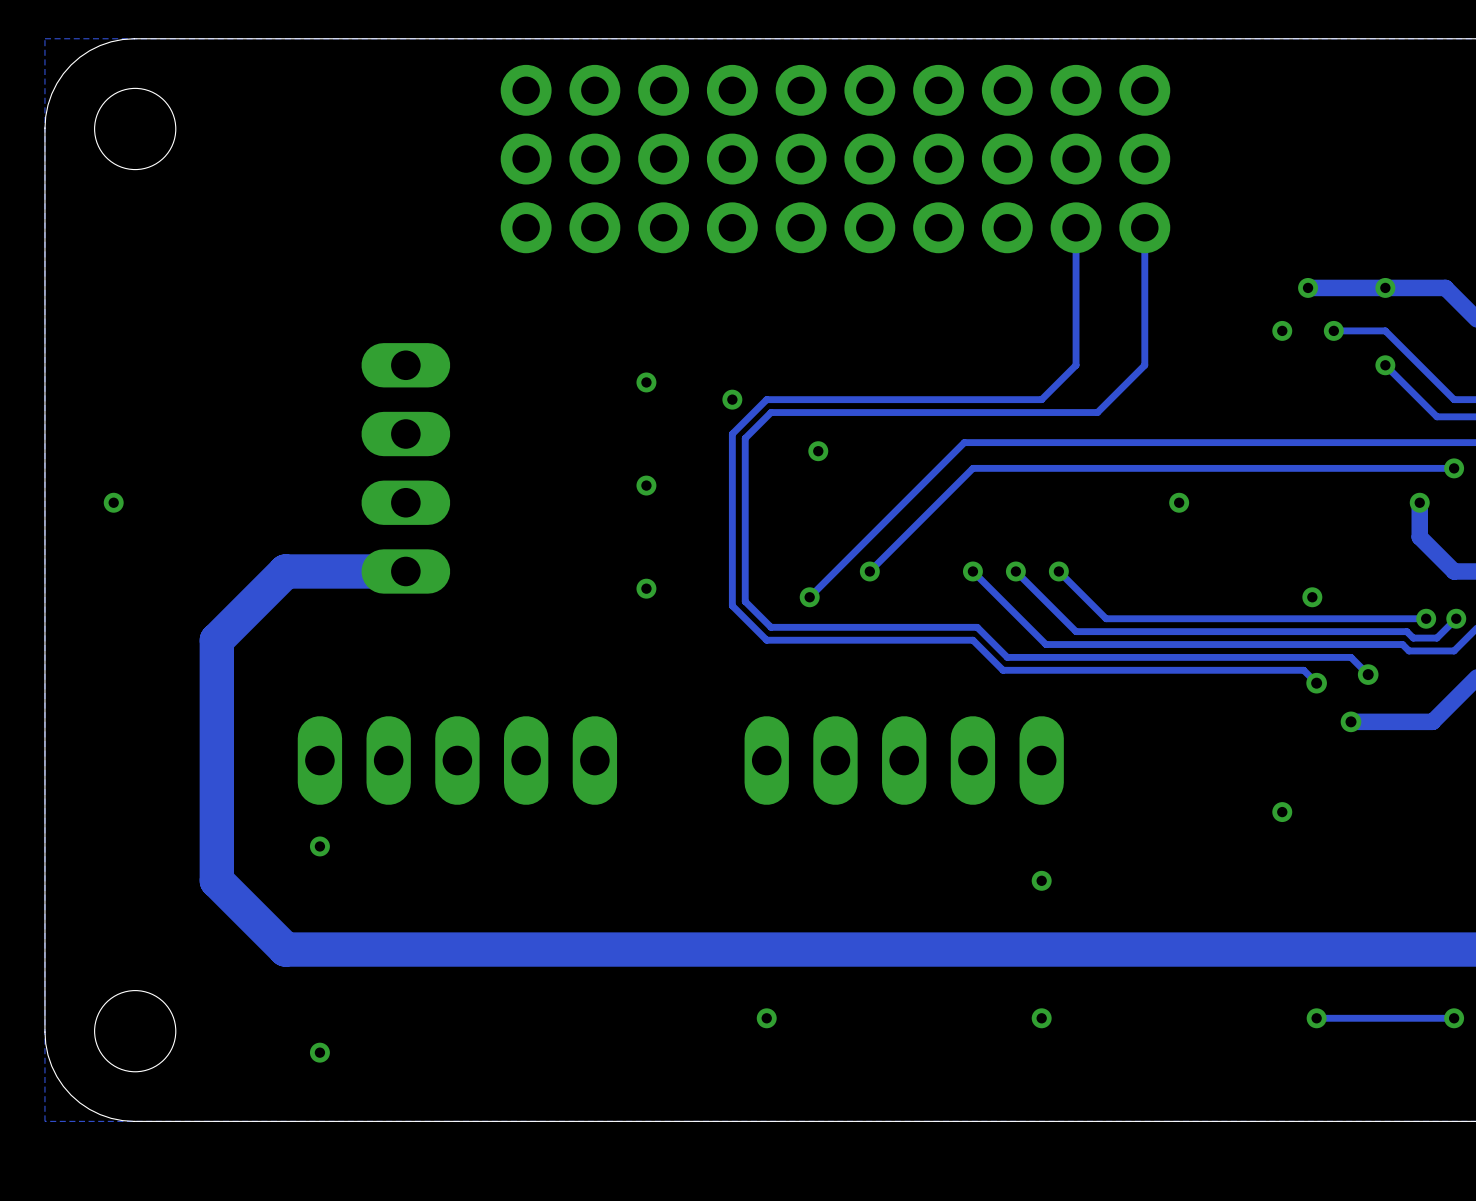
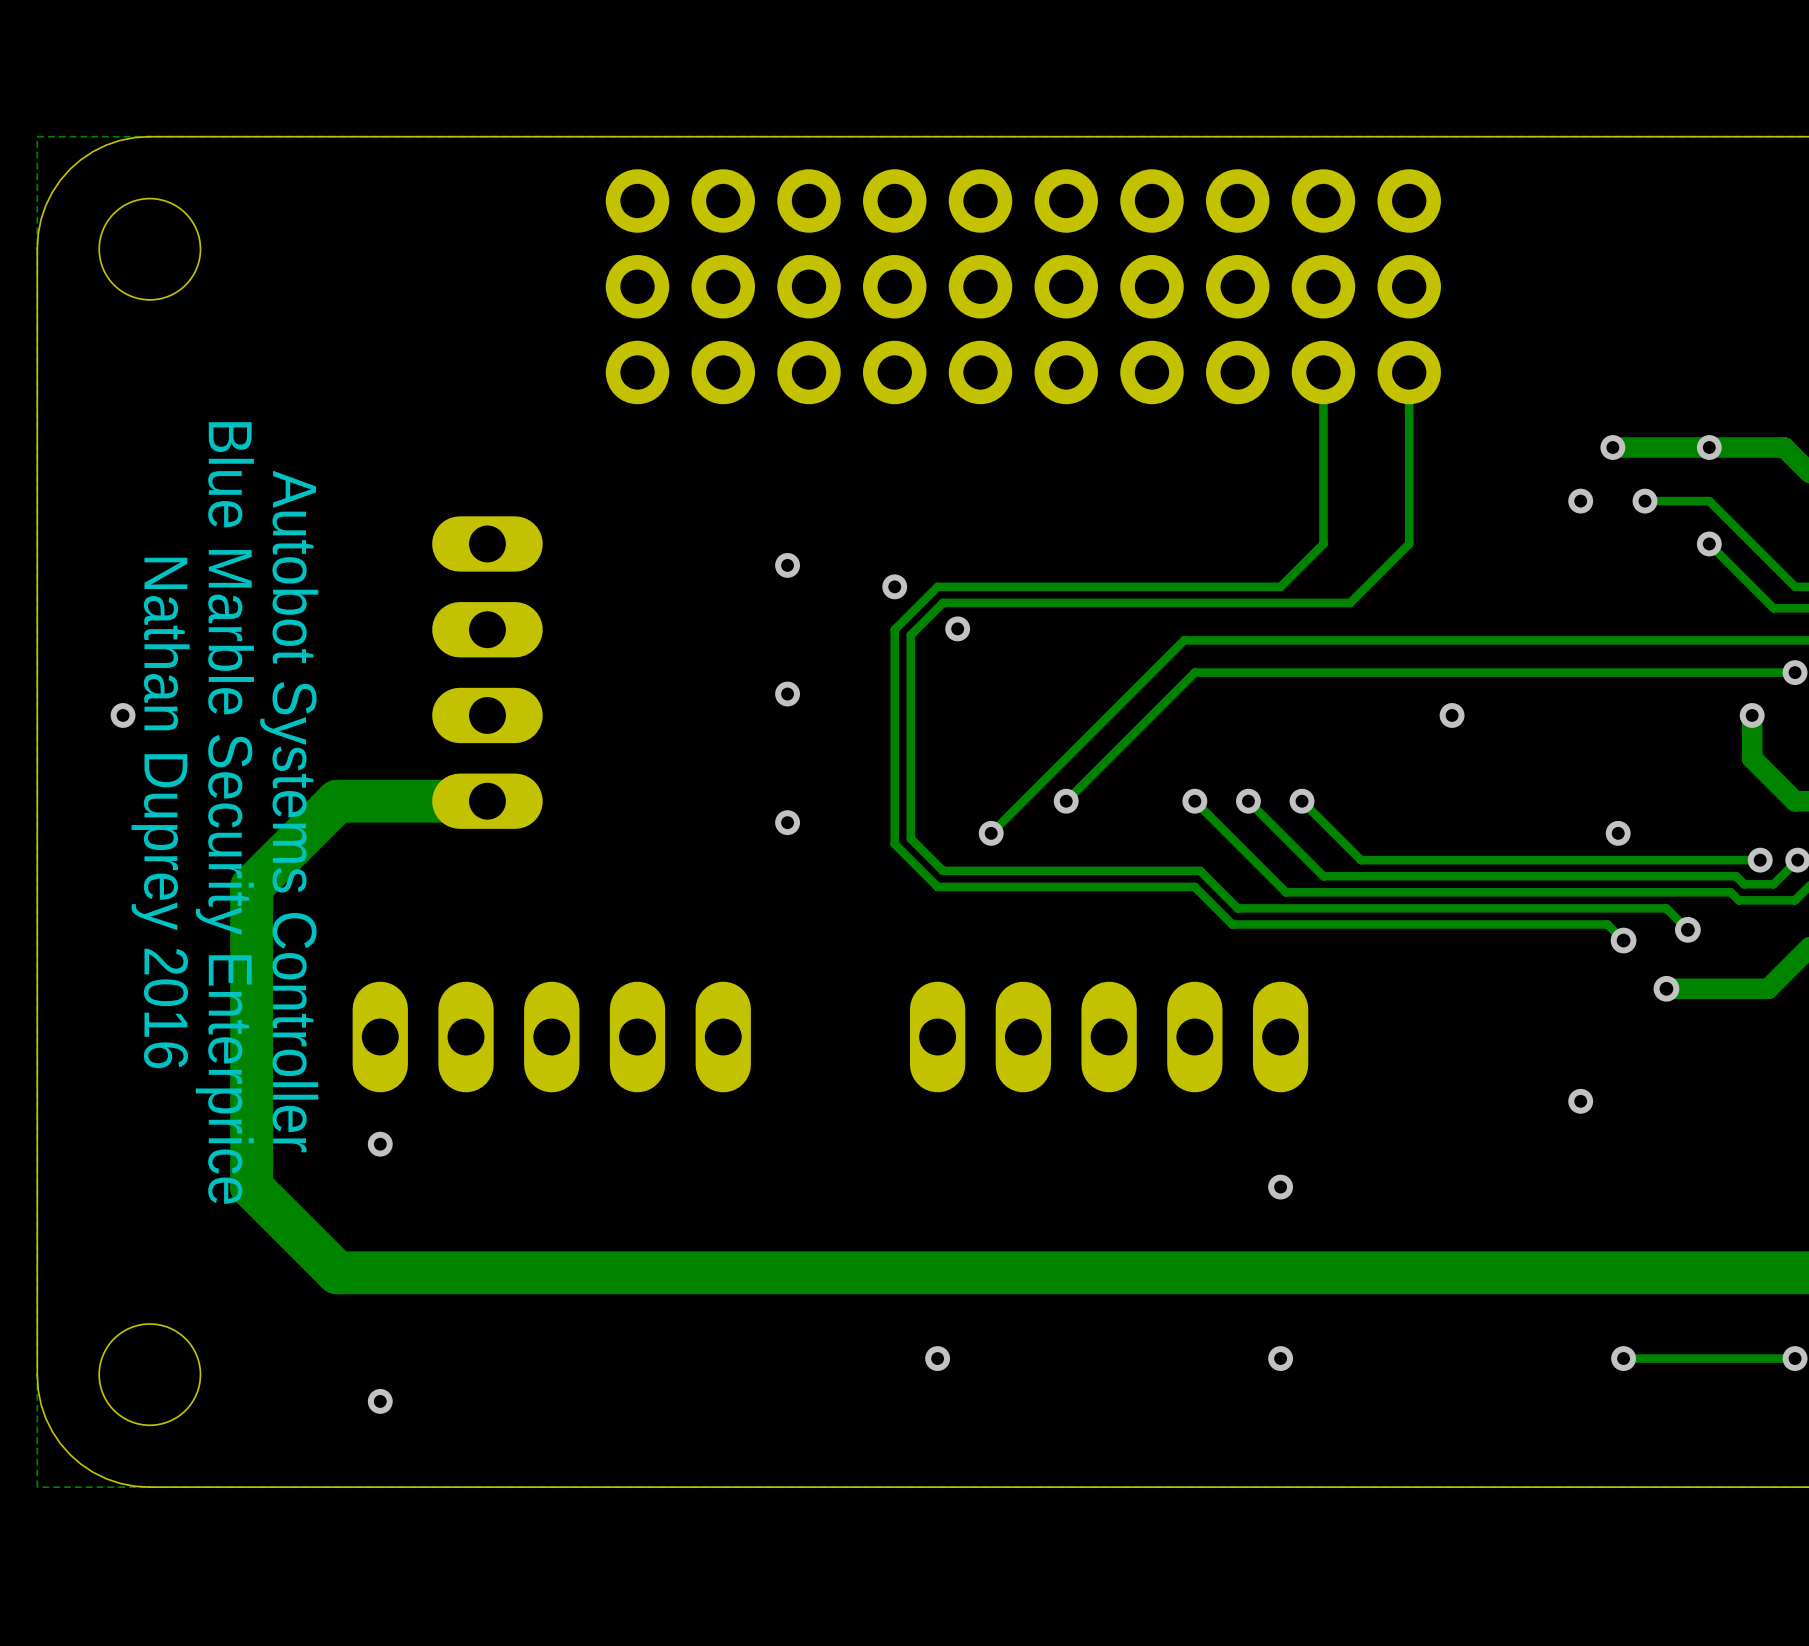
via position: (818, 451) -> (957, 628)
text: none -> Nathan Duprey 2016 (160, 812)
text: none -> Blue Marble Security Enterprice (224, 812)
text: none -> Autobot Systems Controller (289, 811)

